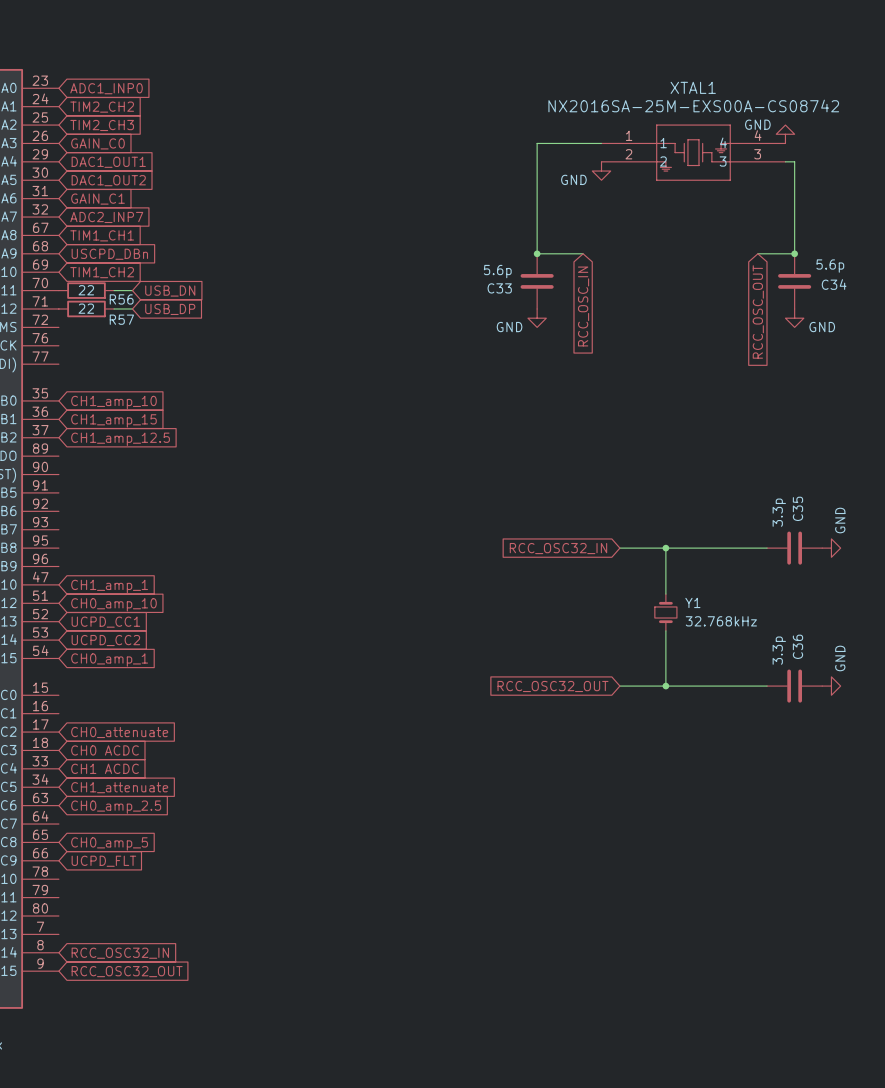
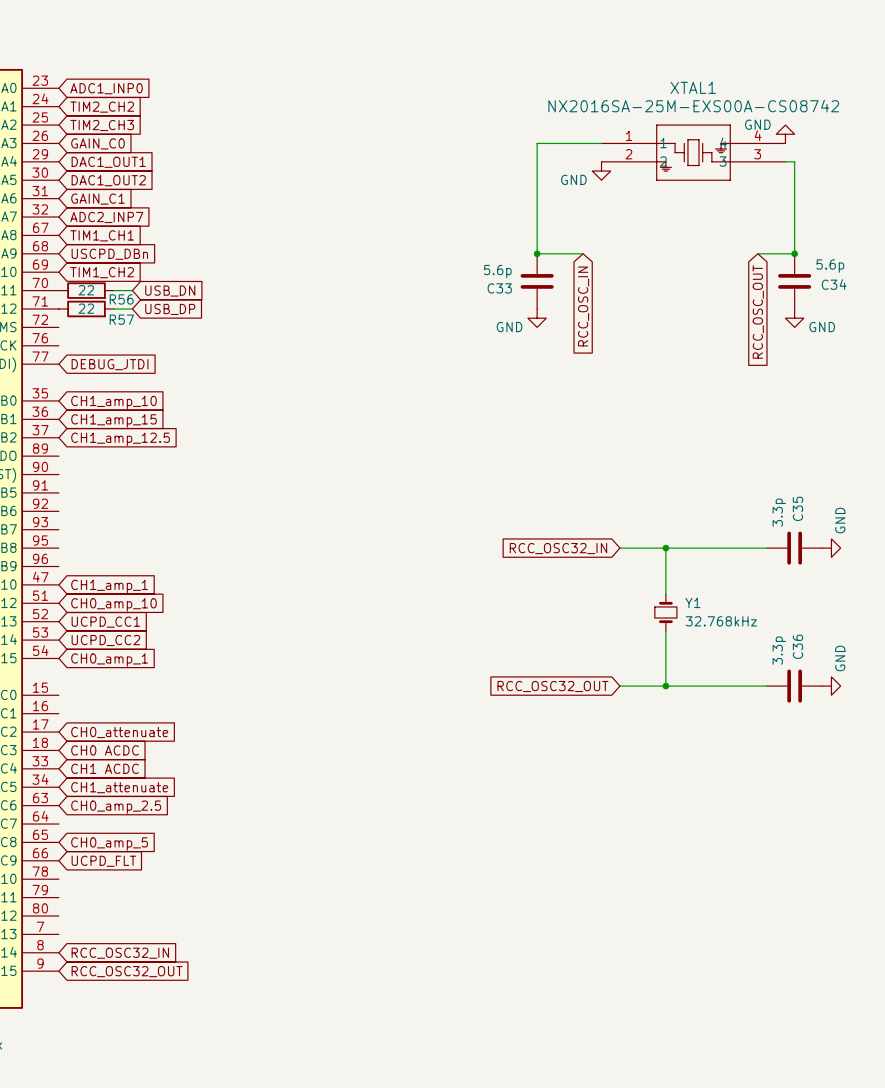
global label: none -> DEBUG_JTDI (110, 364)

